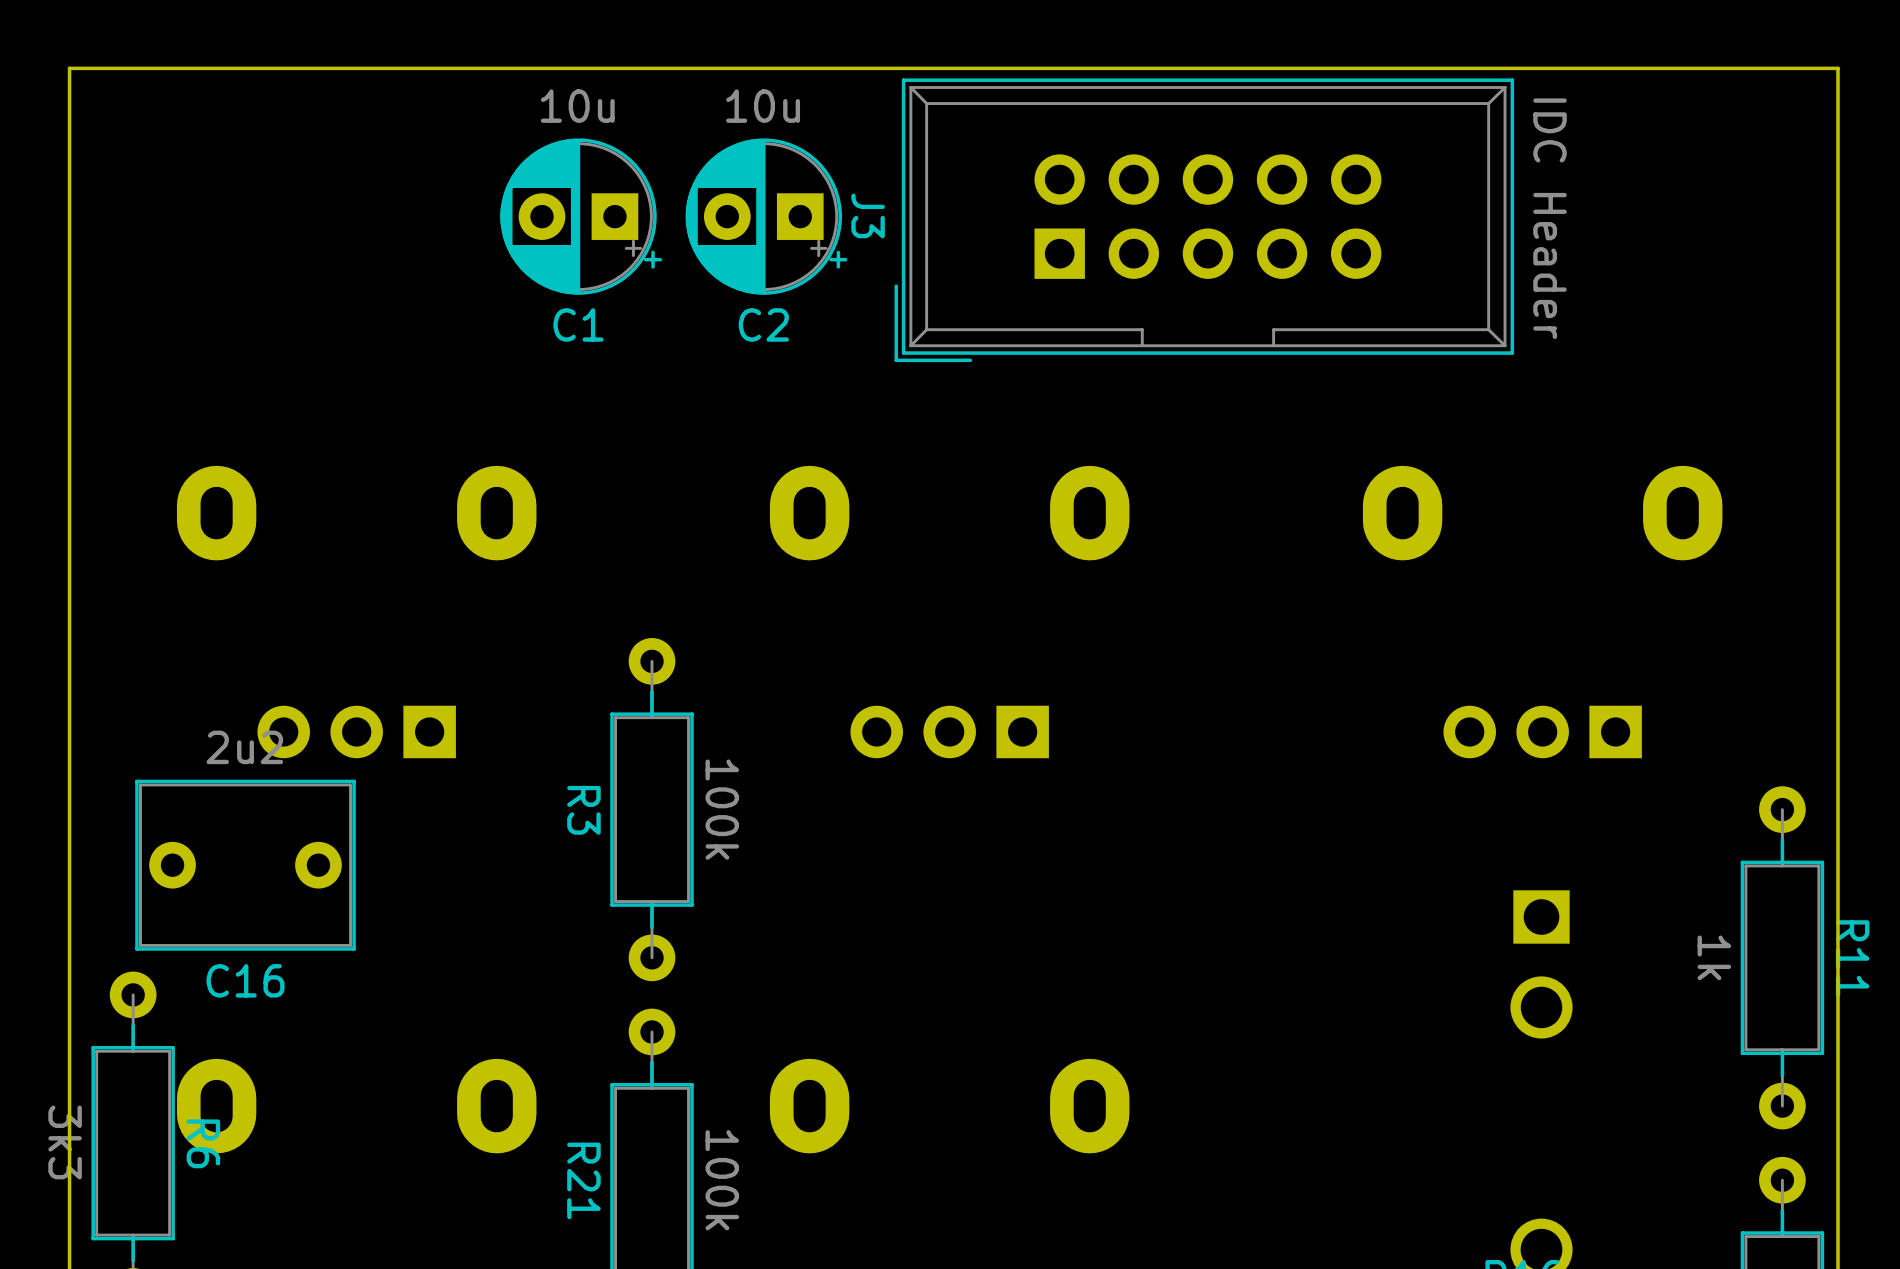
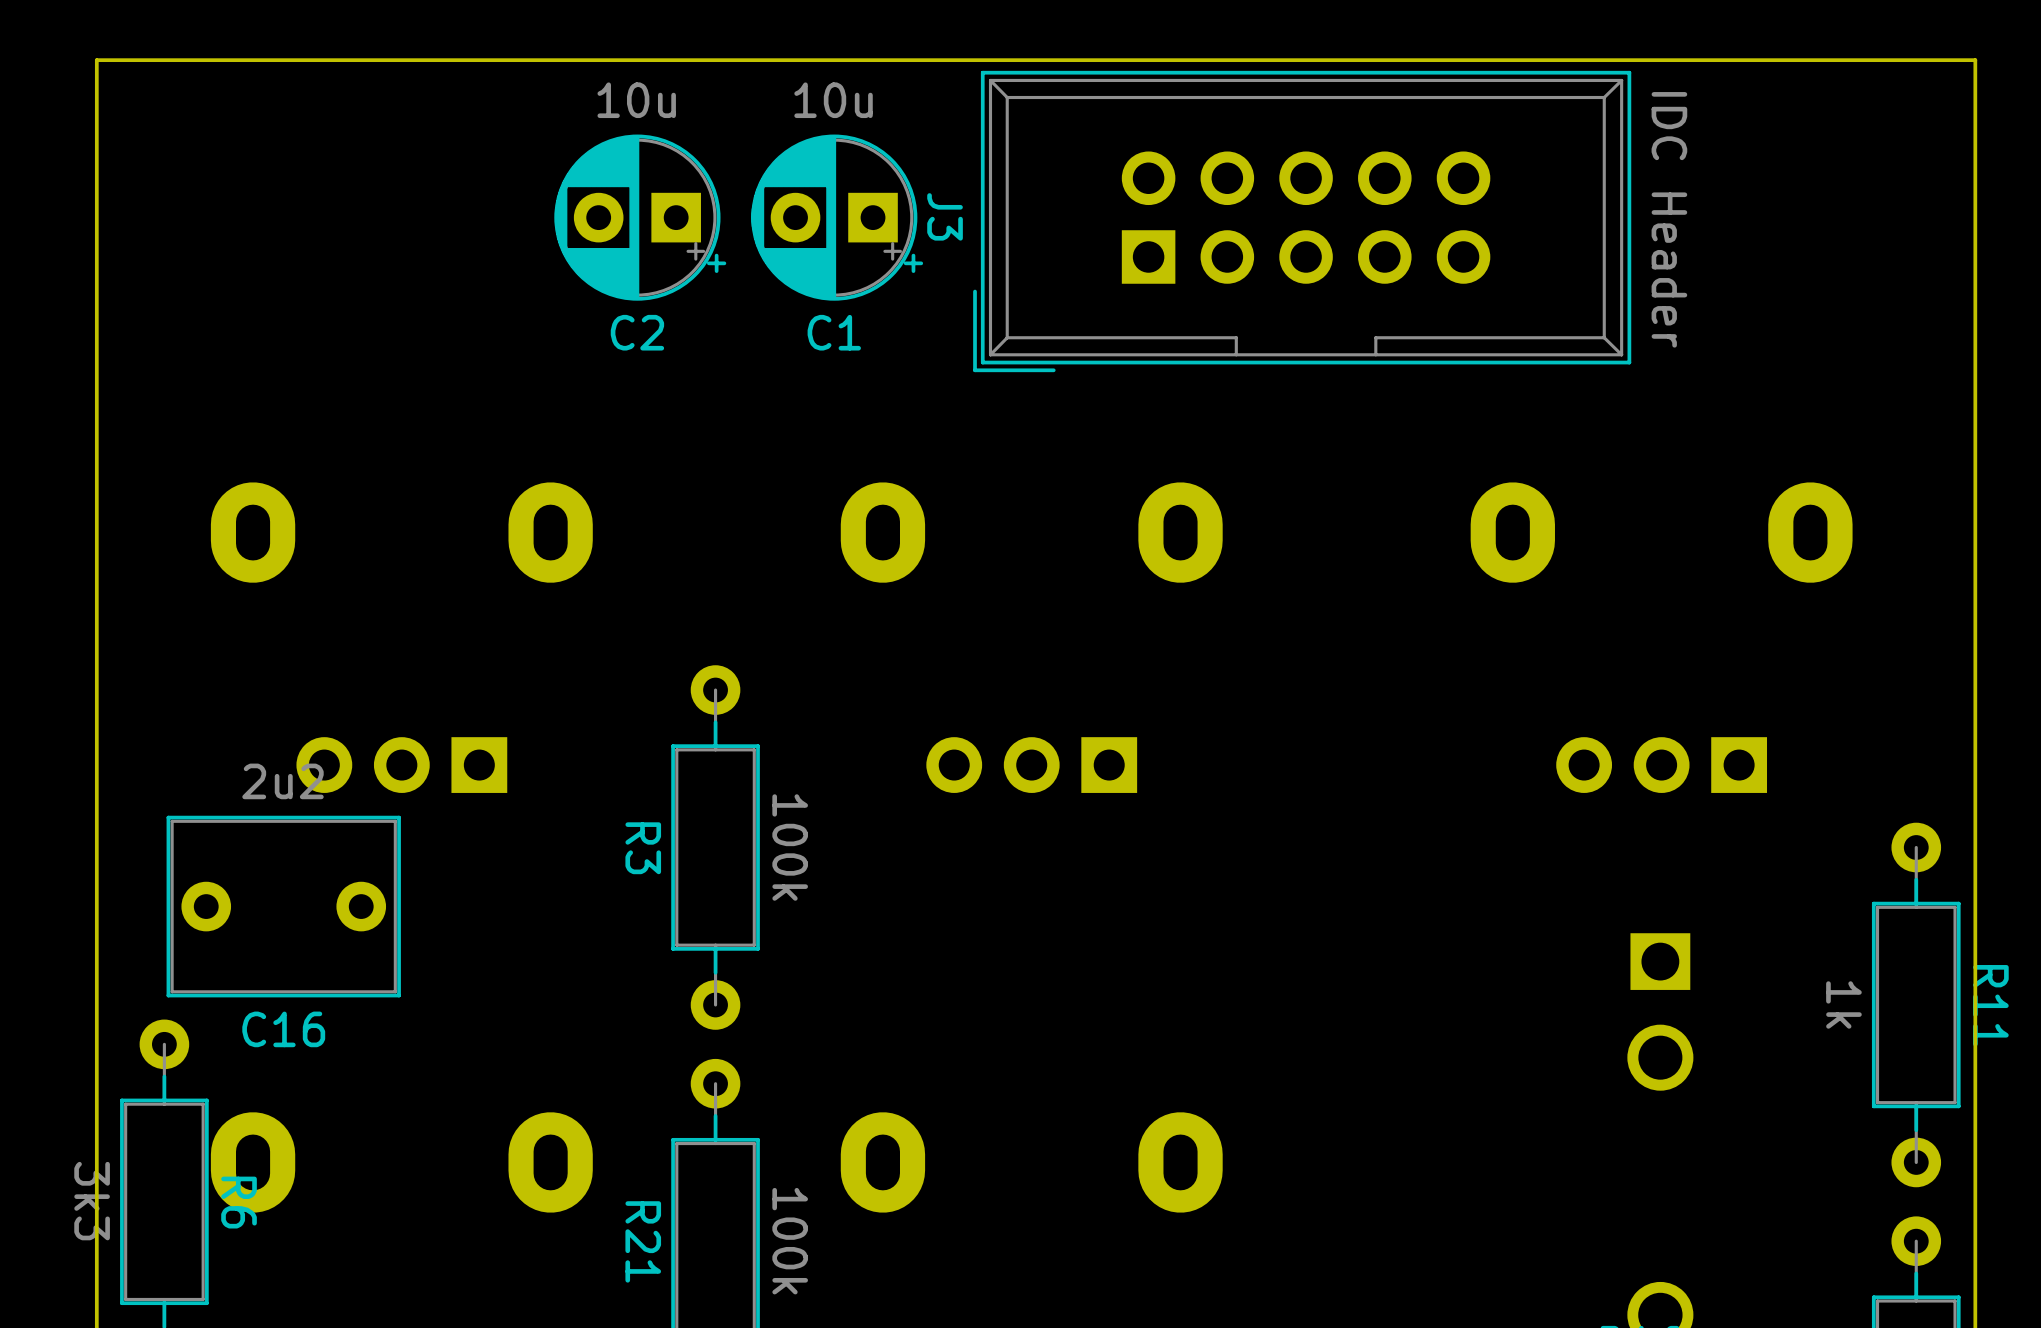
C1 name: C1 (578, 324) -> C2 (637, 332)
C2 name: C2 (763, 324) -> C1 (834, 332)

